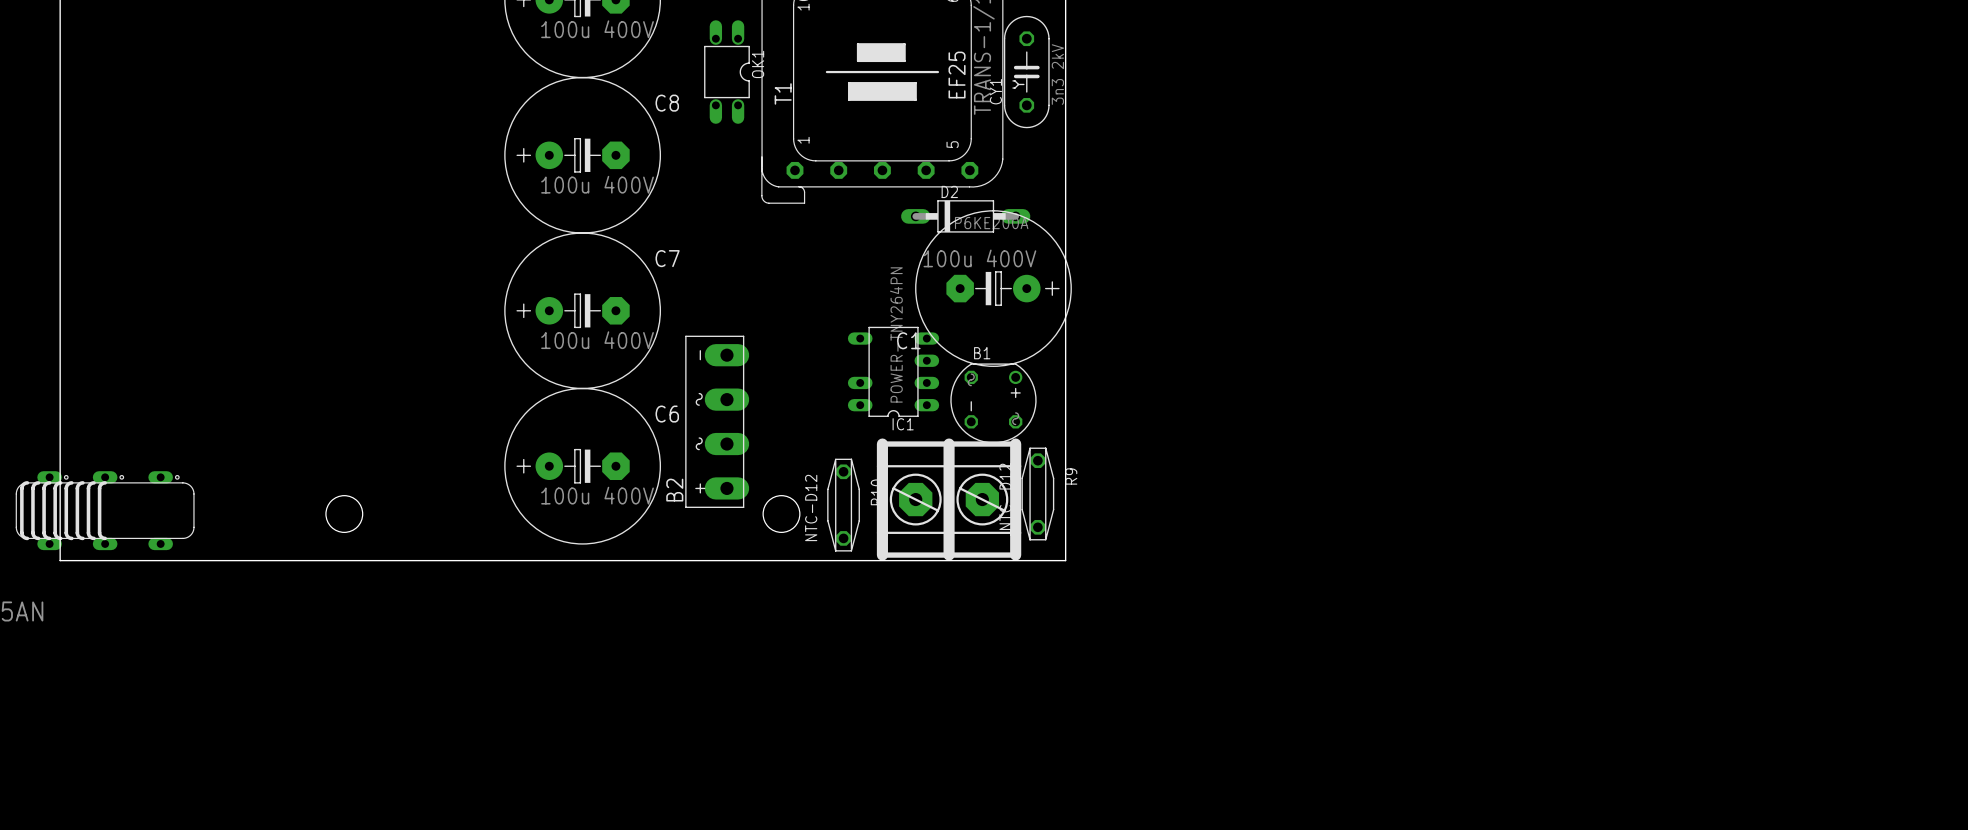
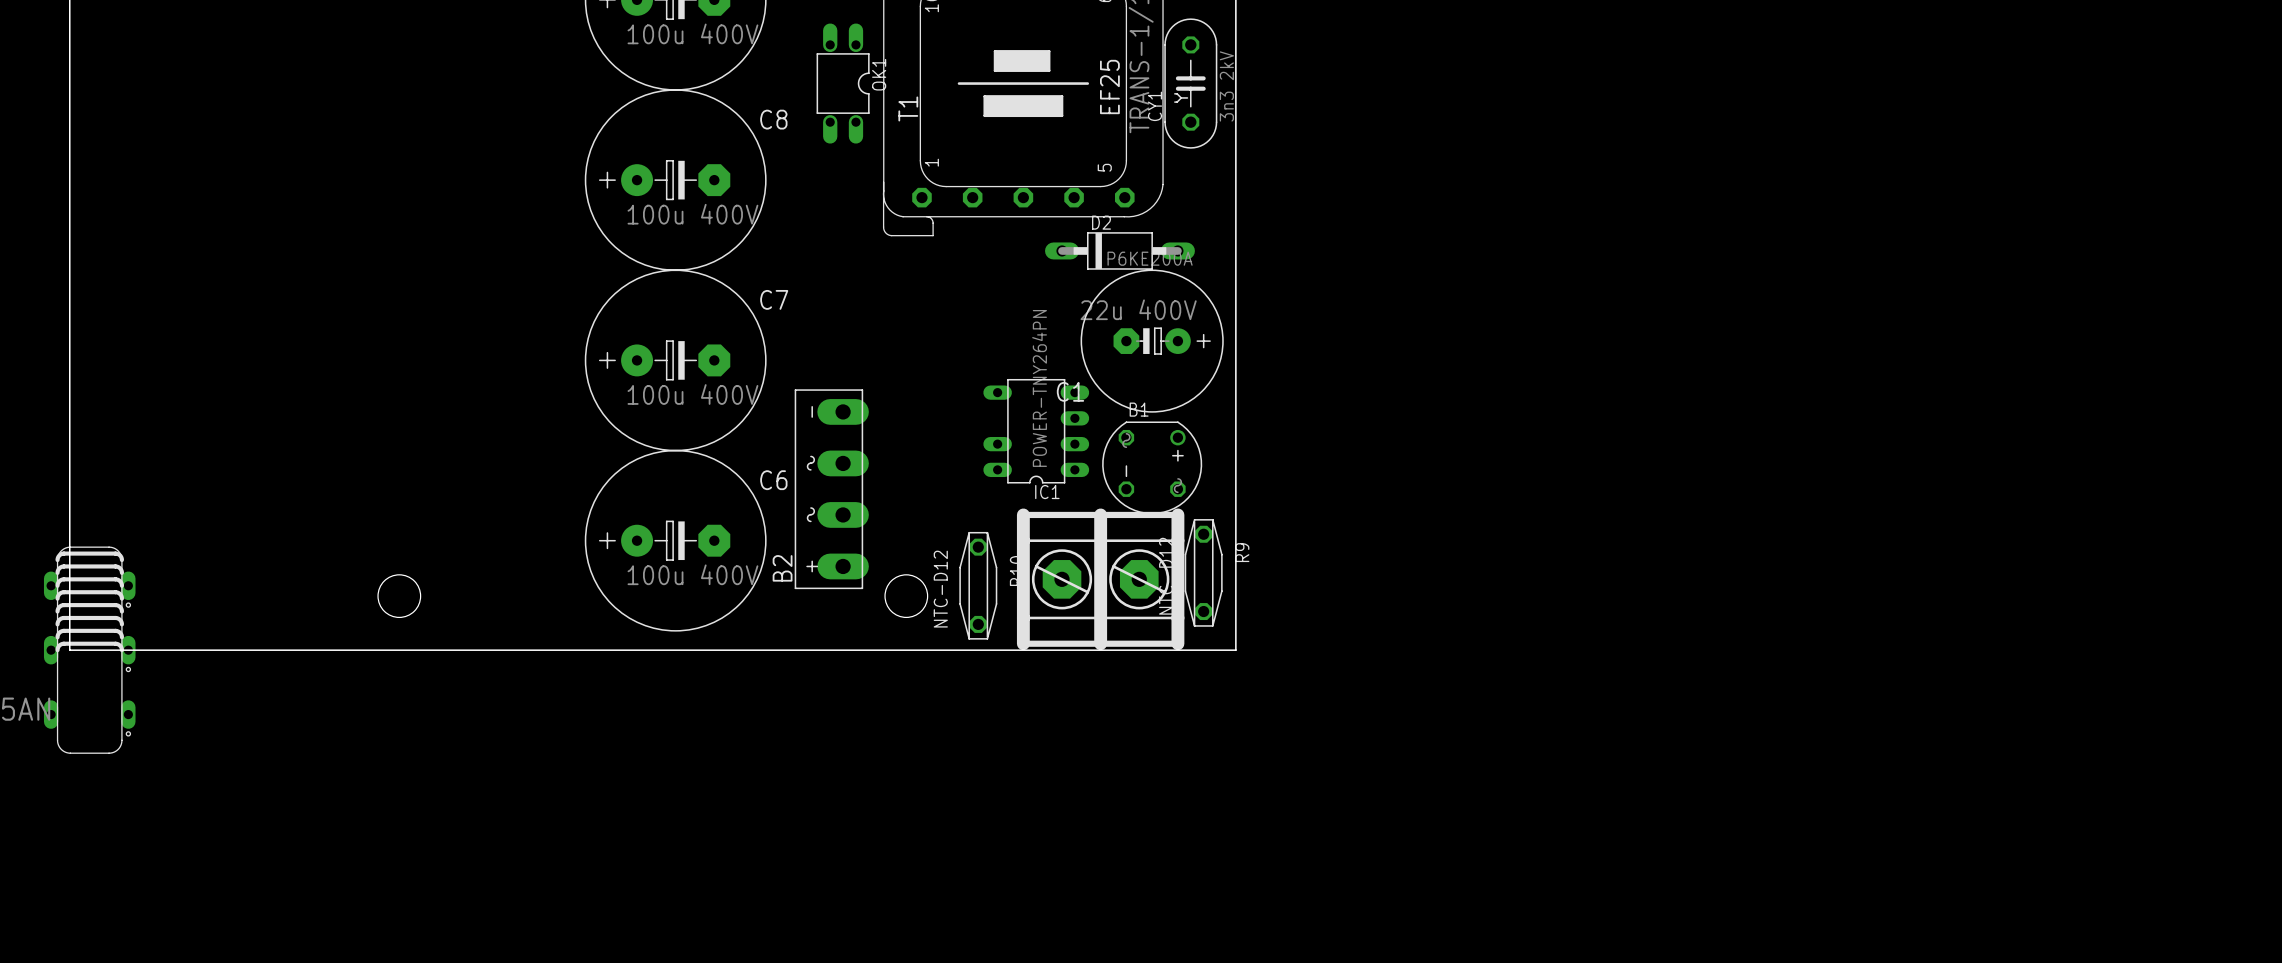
C1 footprint: [915, 210, 1072, 367] -> [1080, 269, 1224, 413]
C1 value: 100u 400V (979, 258) -> 22u 400V (1138, 309)
part rotation: 0° (105, 510) -> 90° clockwise (89, 650)

